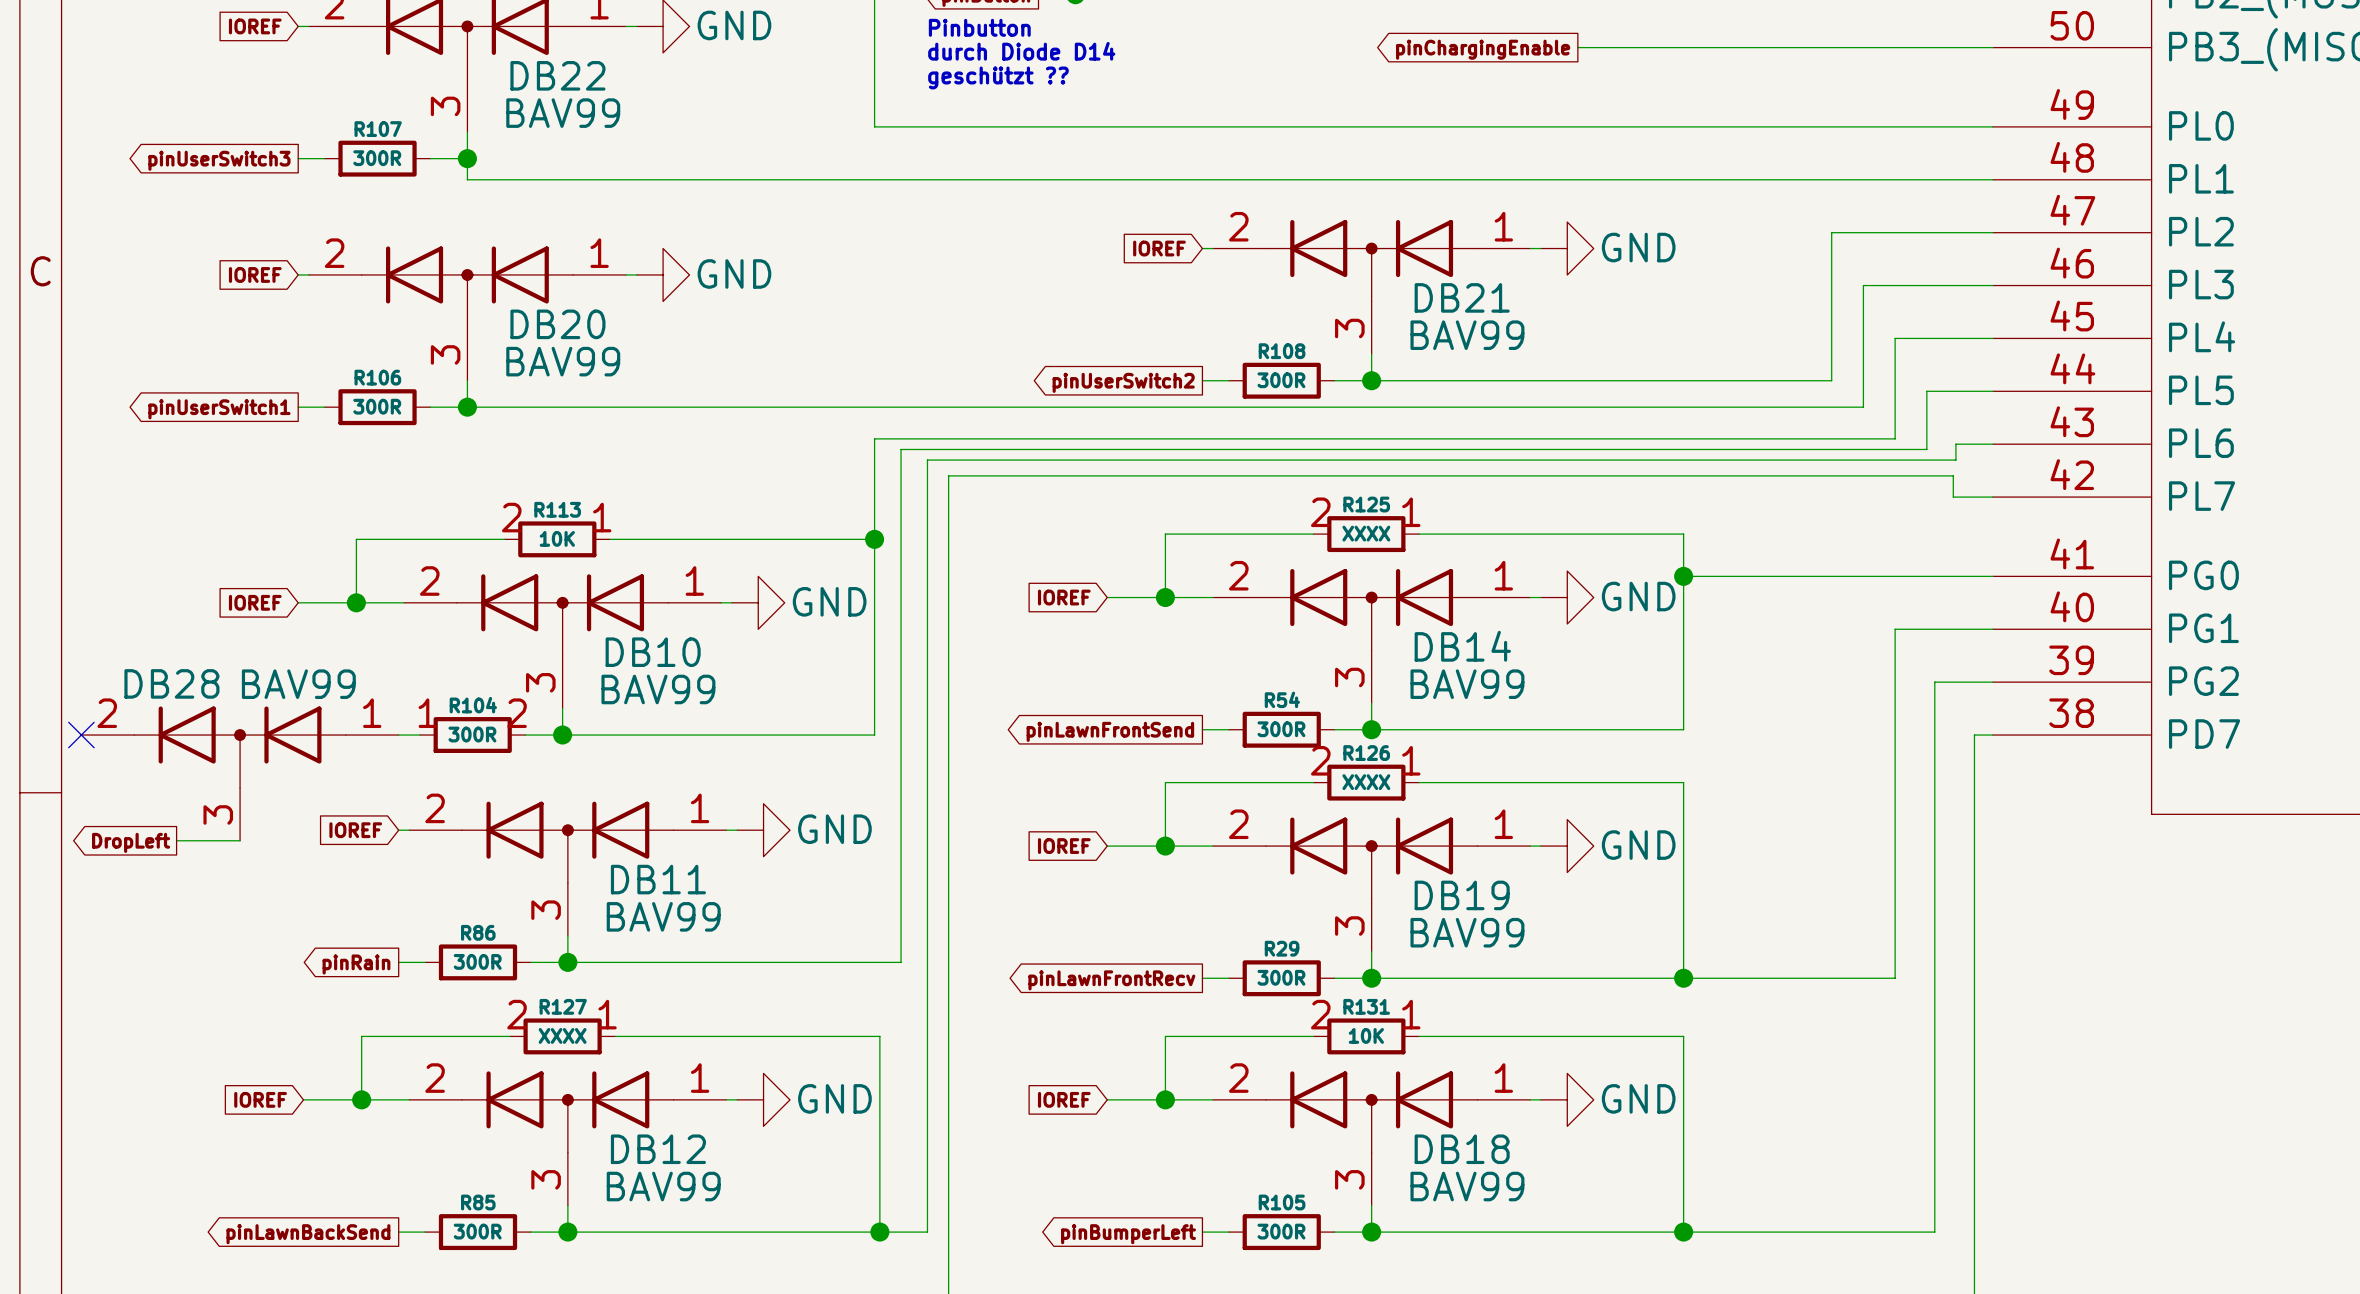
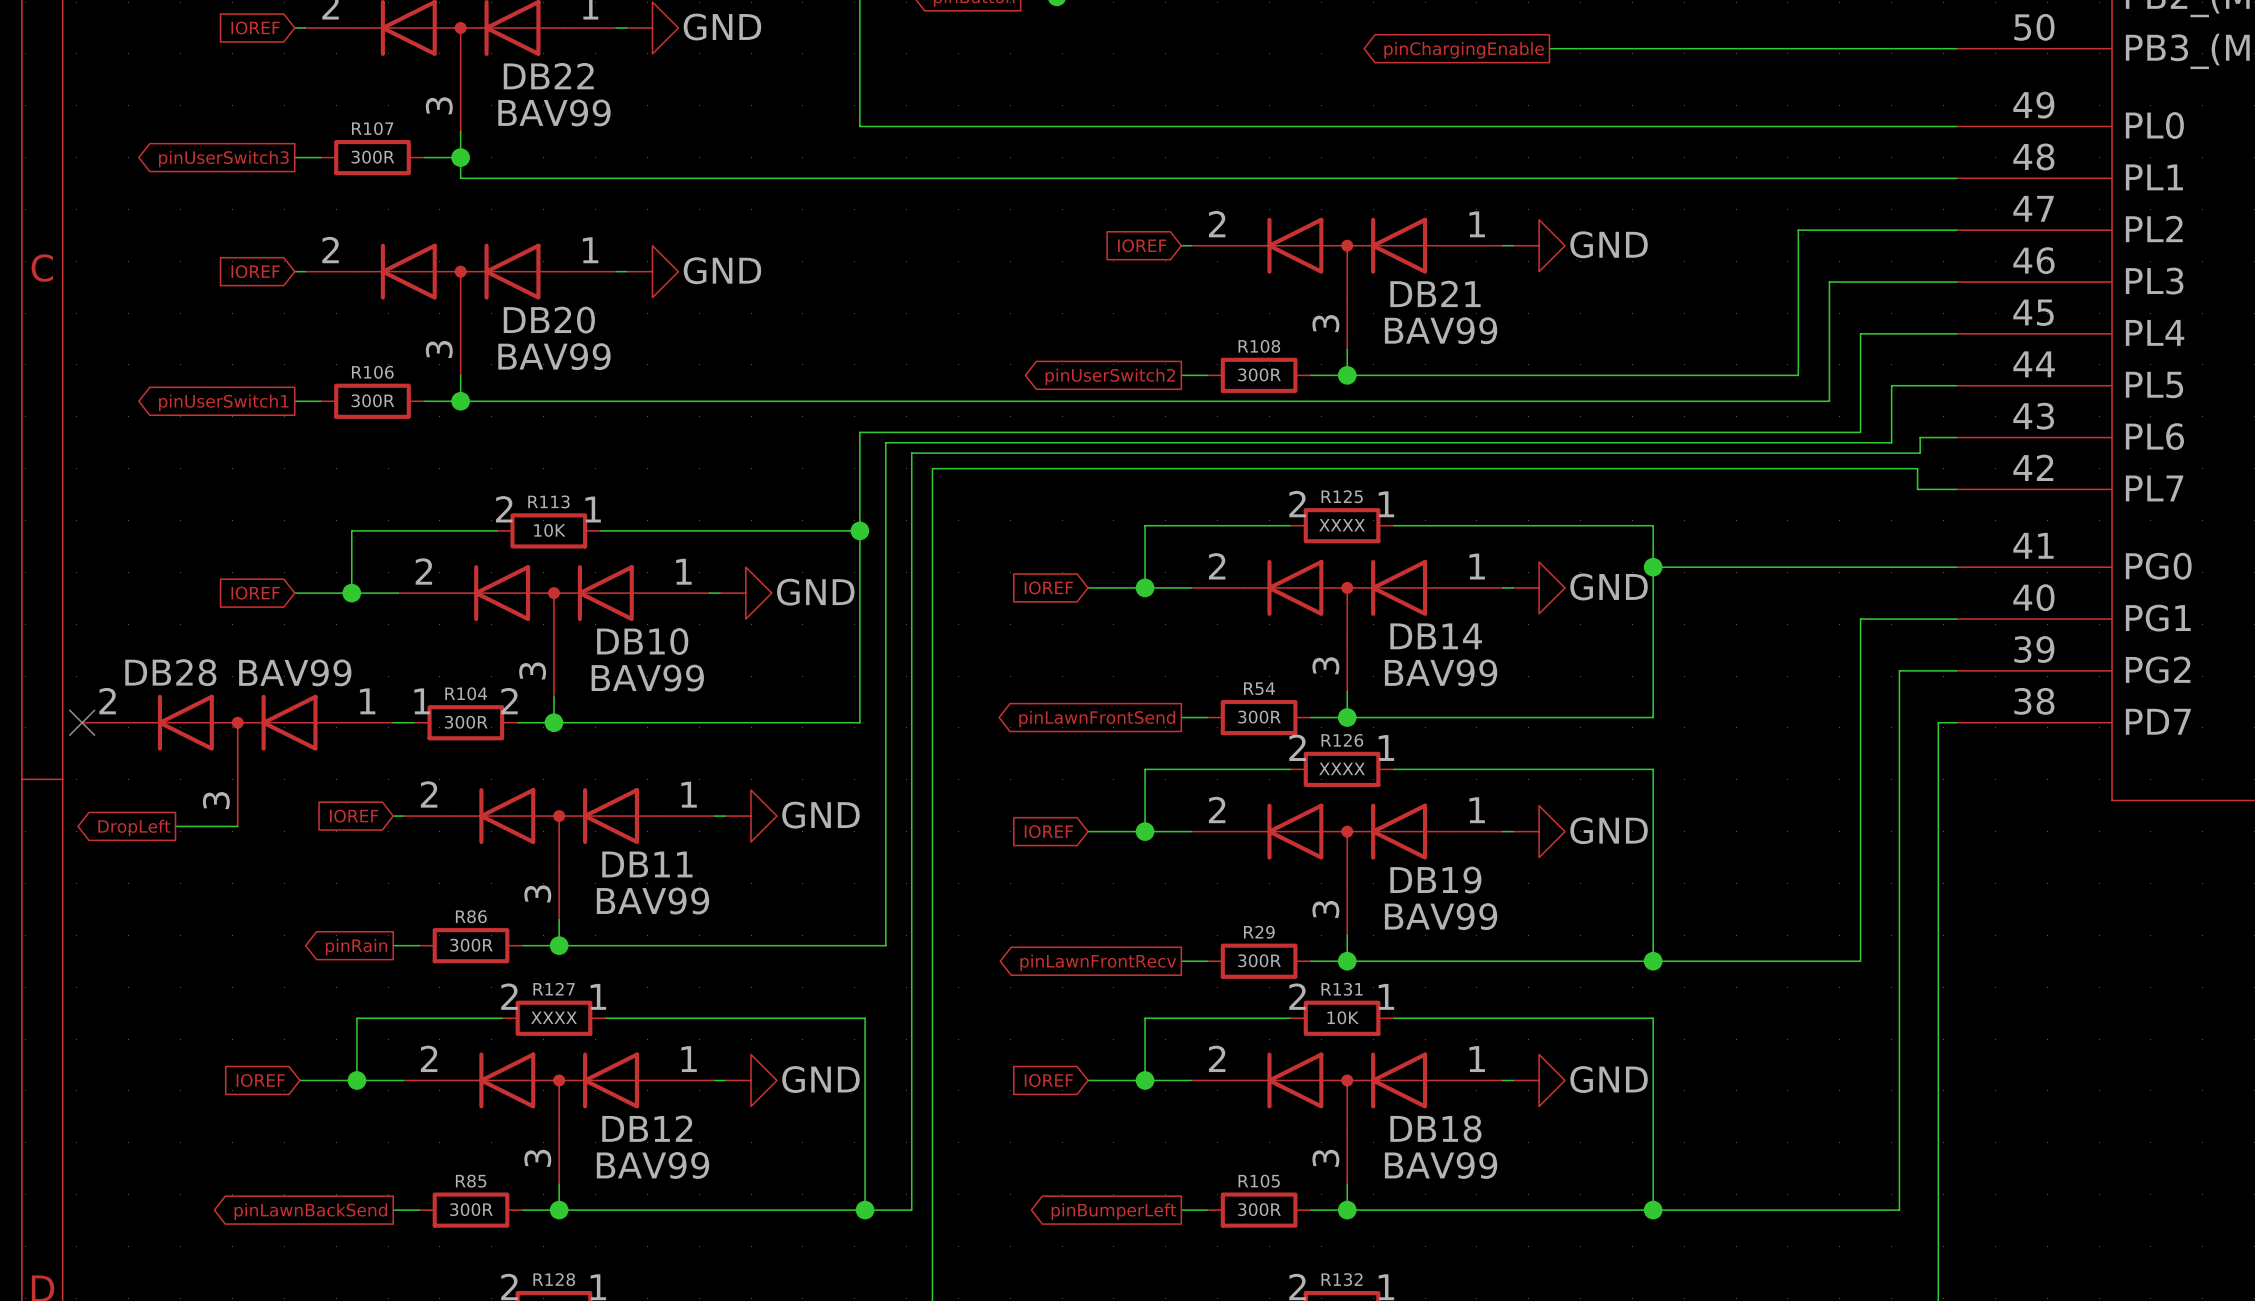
text: Pinbutton (979, 27) -> none
text: durch Diode D14 (1021, 51) -> none
text: geschützt ?? (998, 77) -> none

